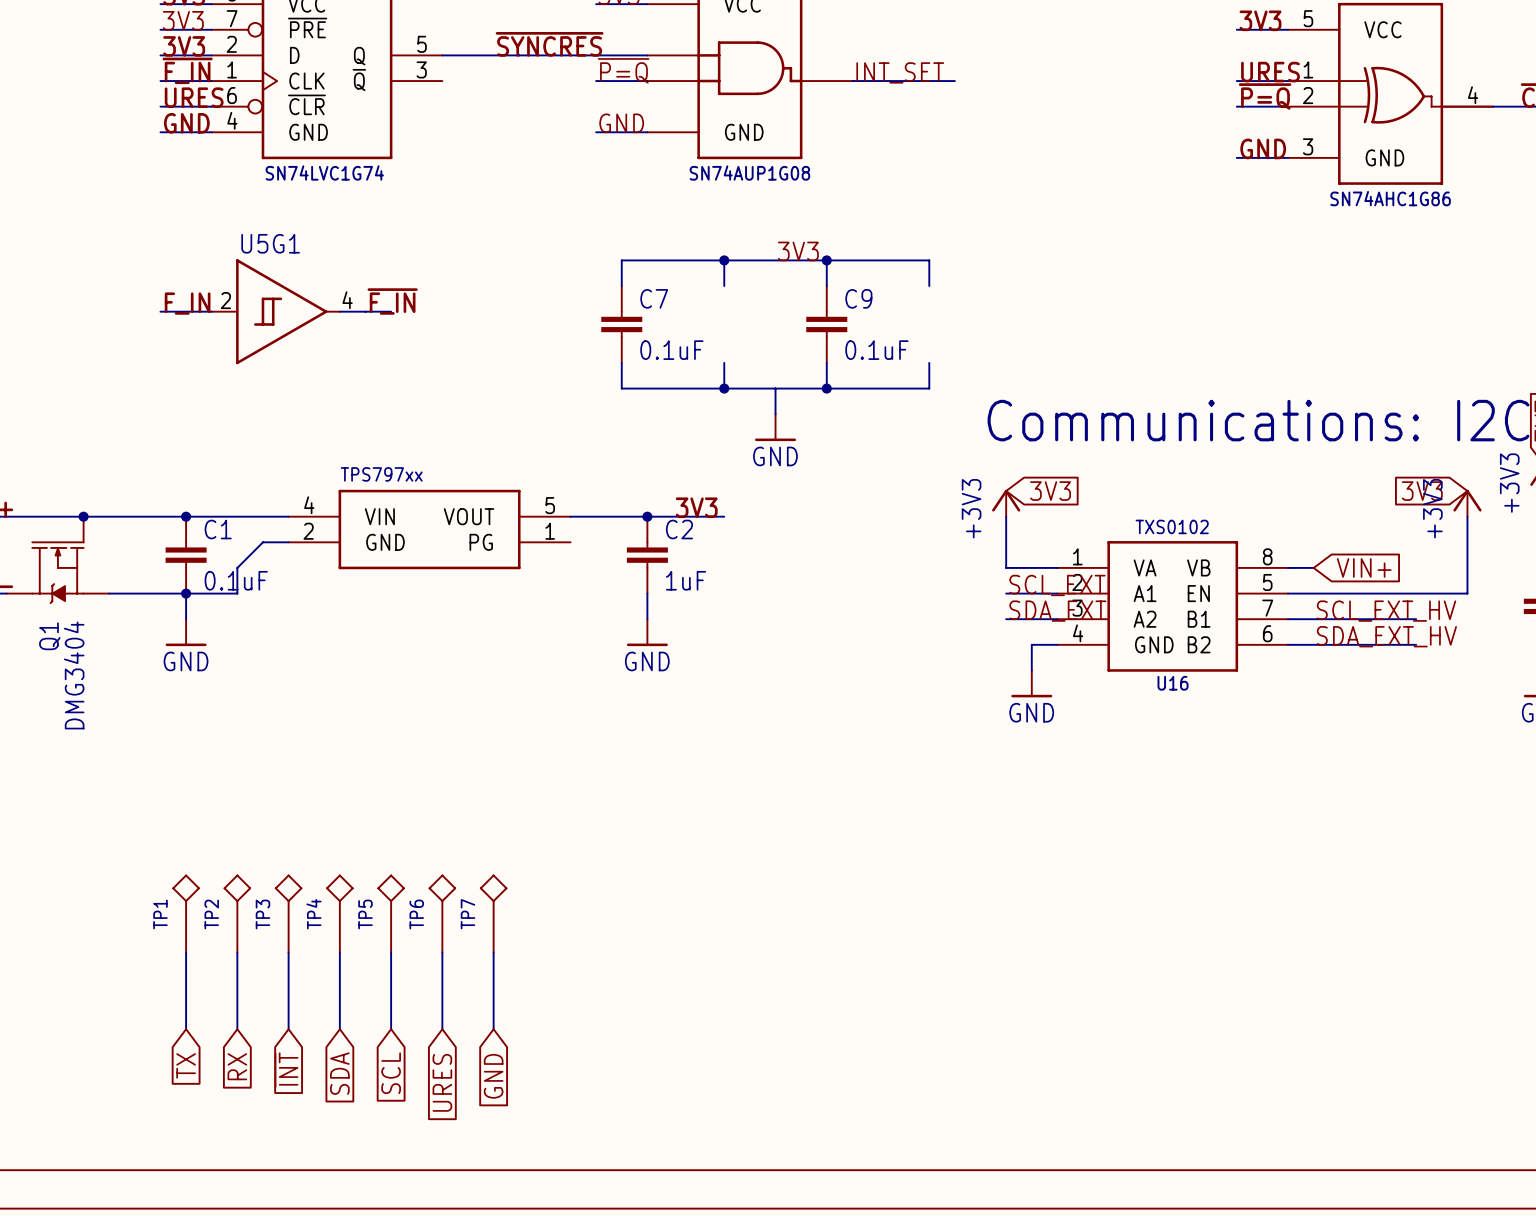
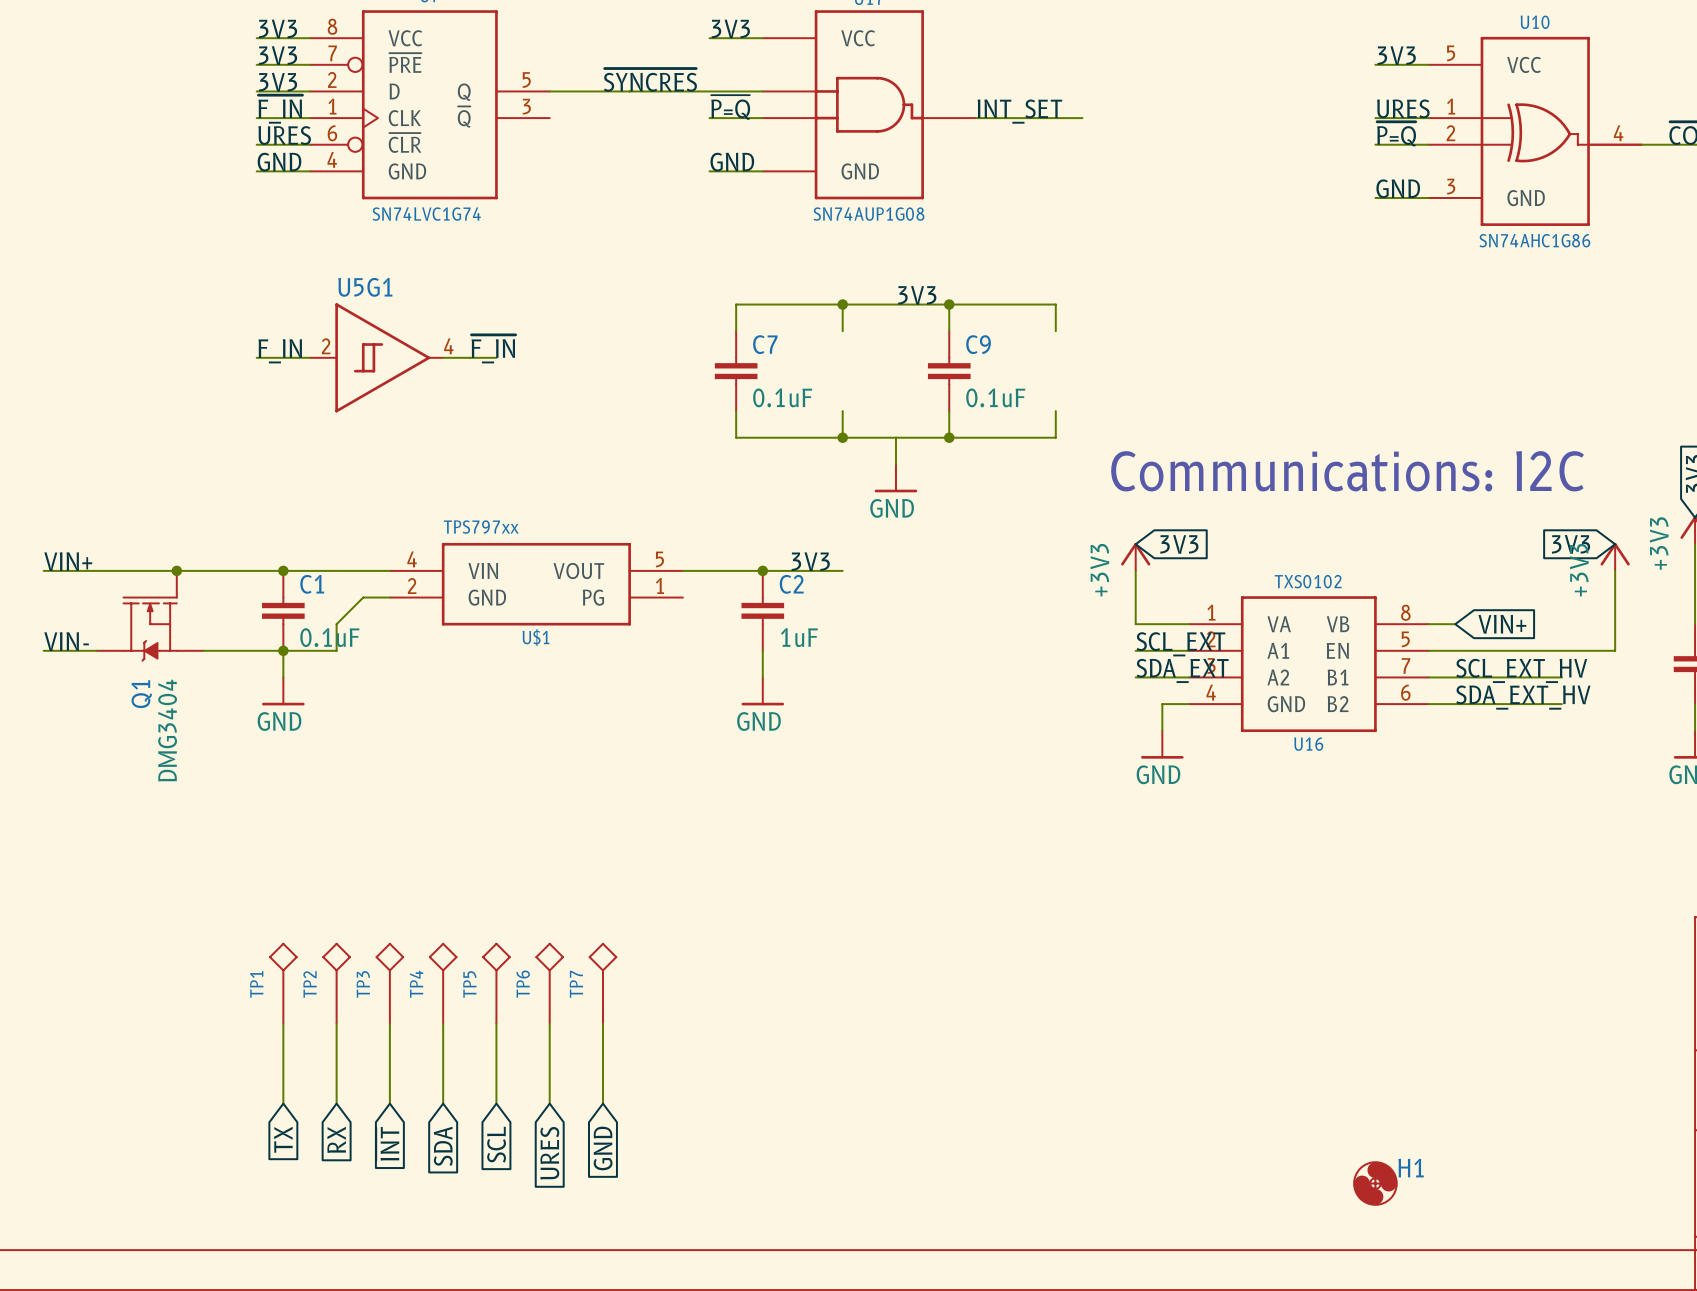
U$1 name: none -> U$1 (536, 637)
H1: none -> (1375, 1183)

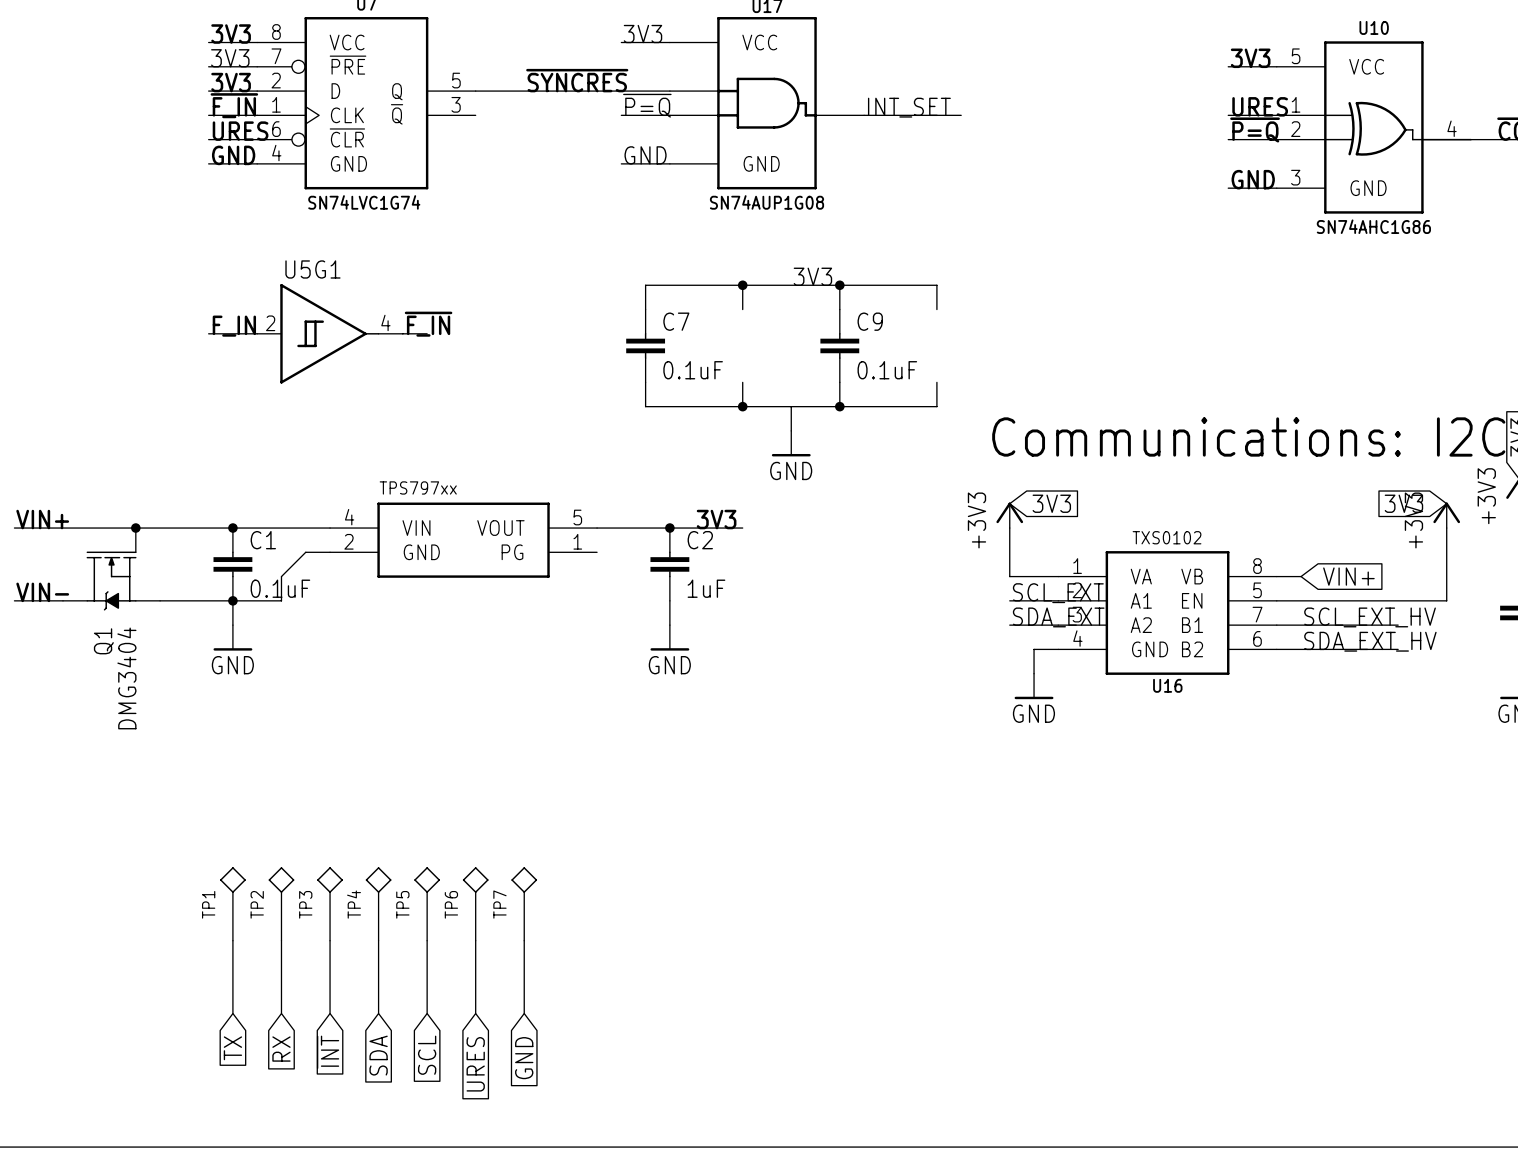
U$1 name: U$1 (536, 637) -> none
H1: (1375, 1183) -> none

